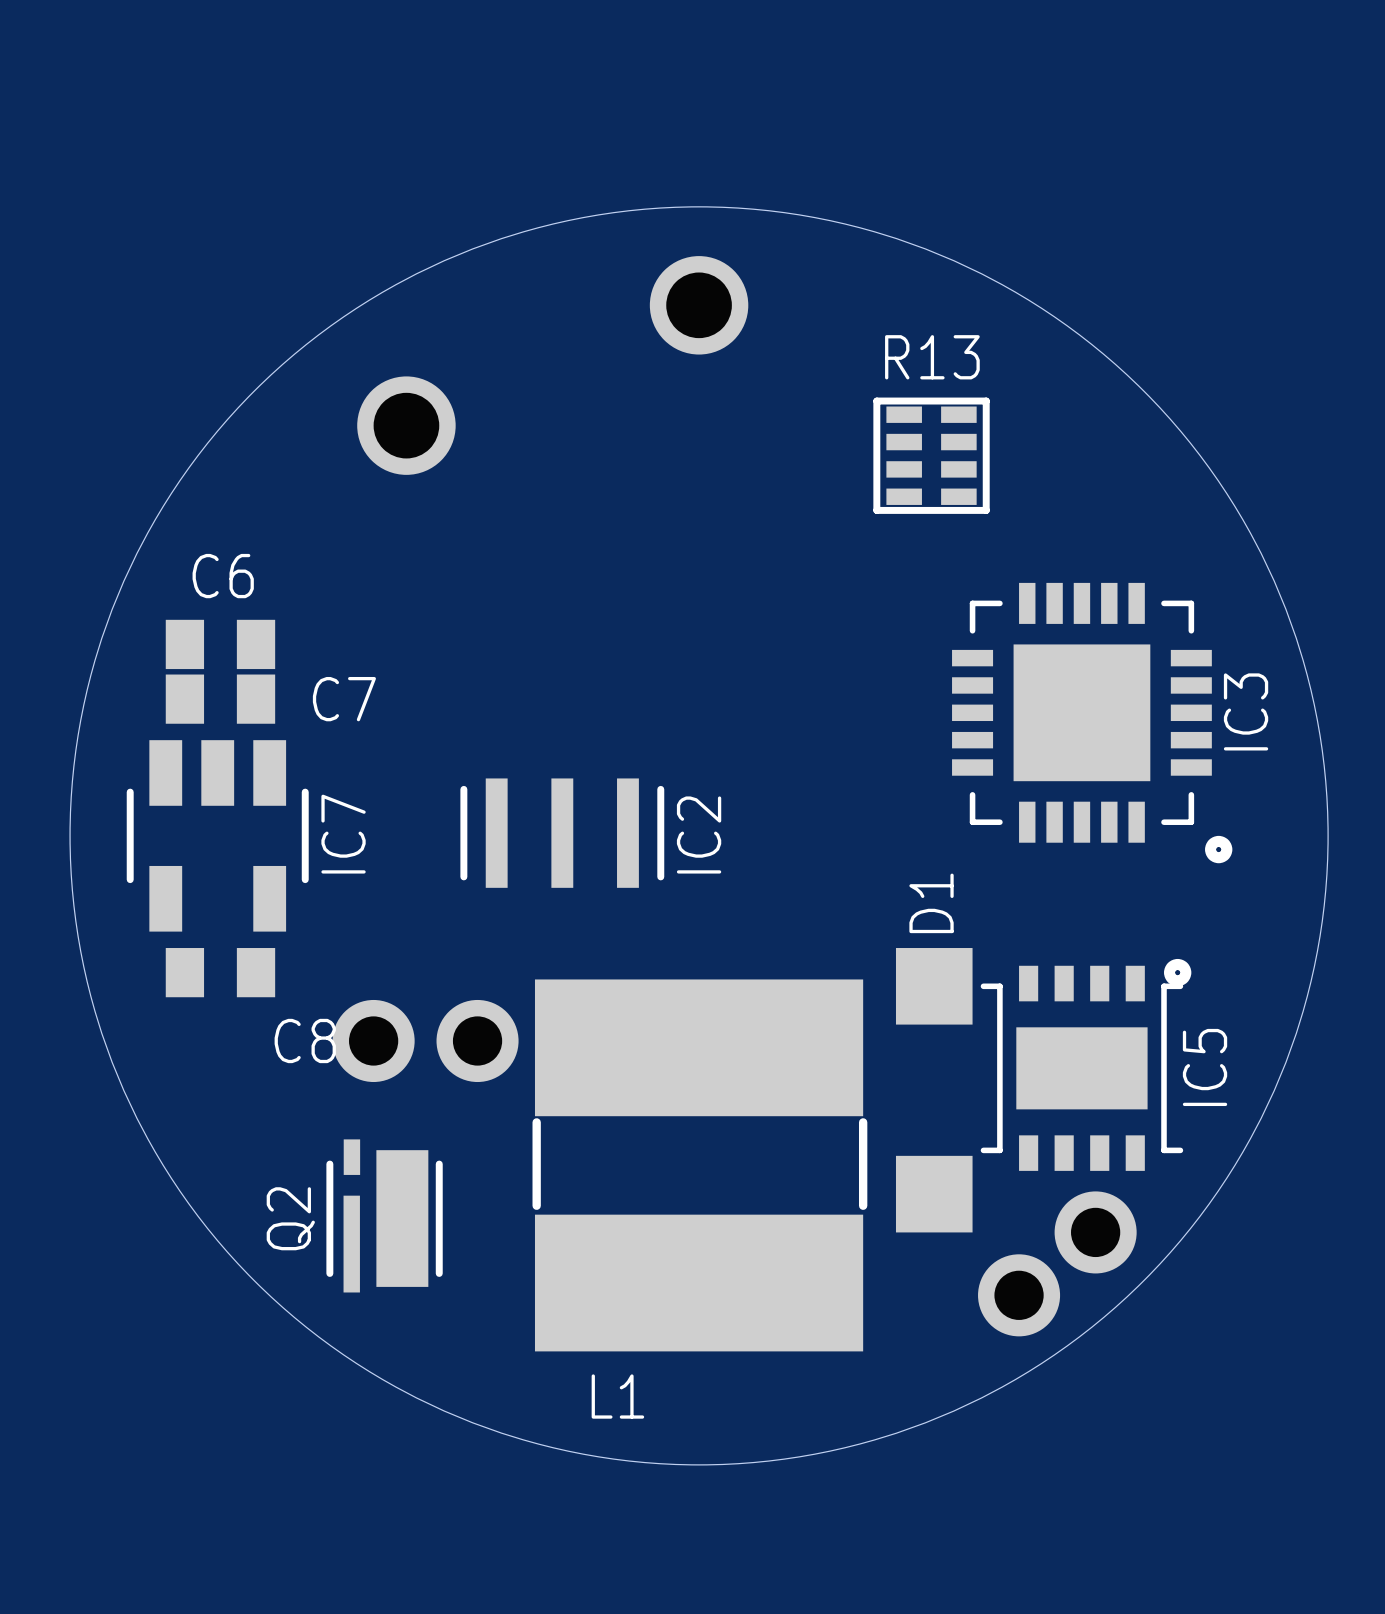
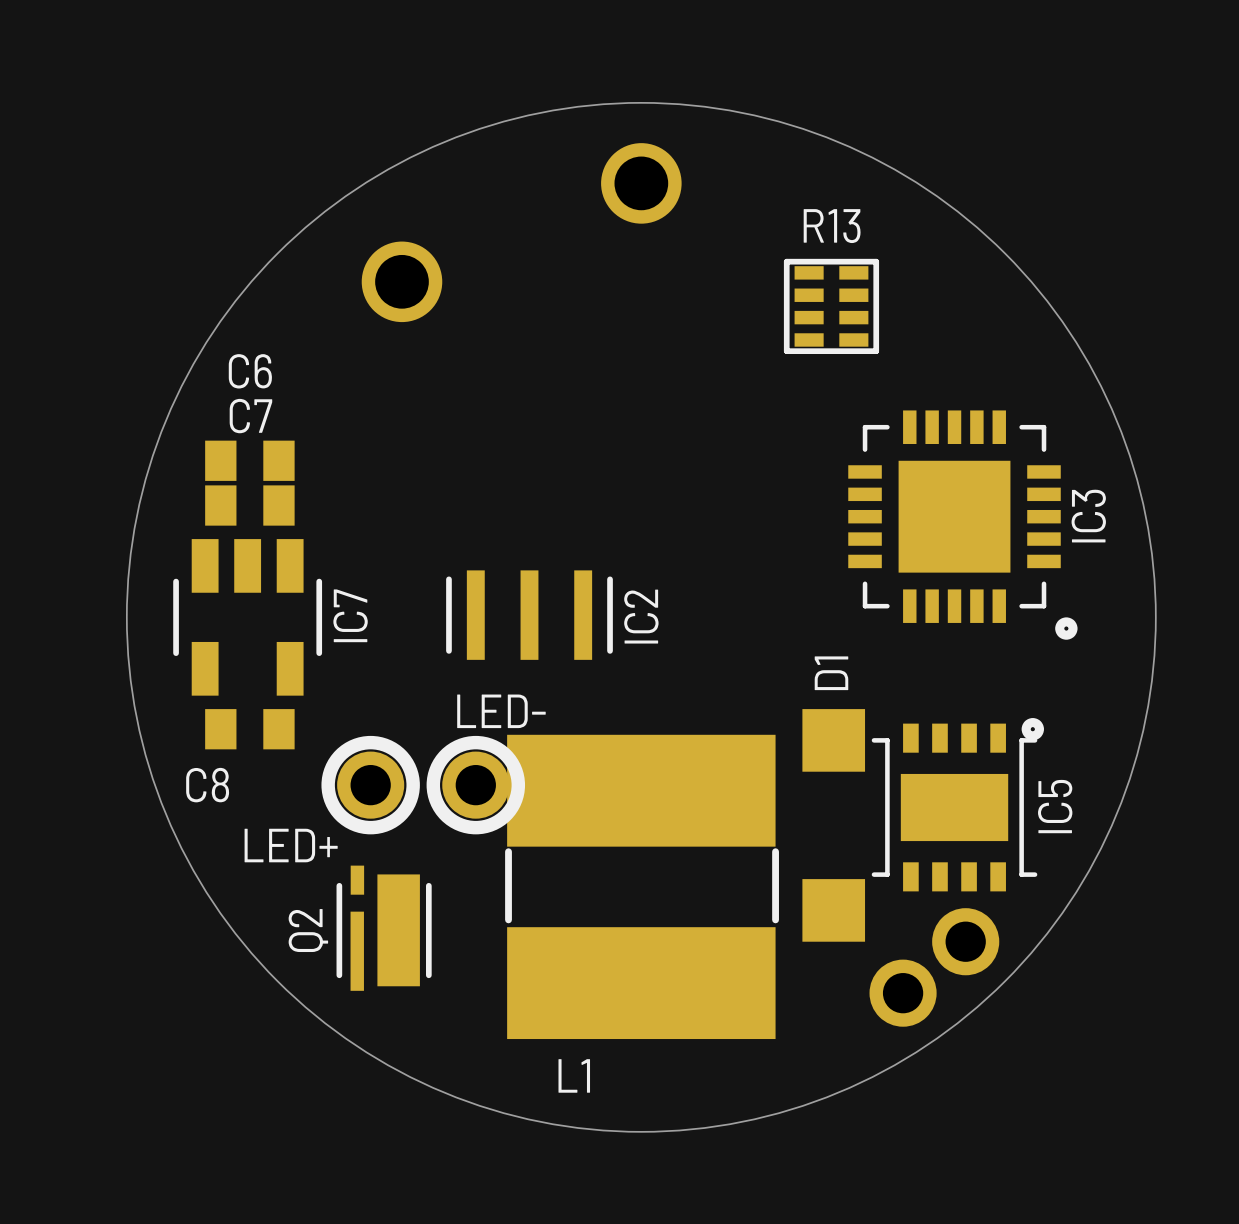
C6 name position: C6 (223, 576) -> C6 (250, 371)
C7 name position: C7 (344, 699) -> C7 (250, 416)
C8 name position: C8 (305, 1040) -> C8 (207, 785)
LED+ side: top (373, 1040) -> bottom (370, 785)
LED- side: top (477, 1040) -> bottom (475, 785)

